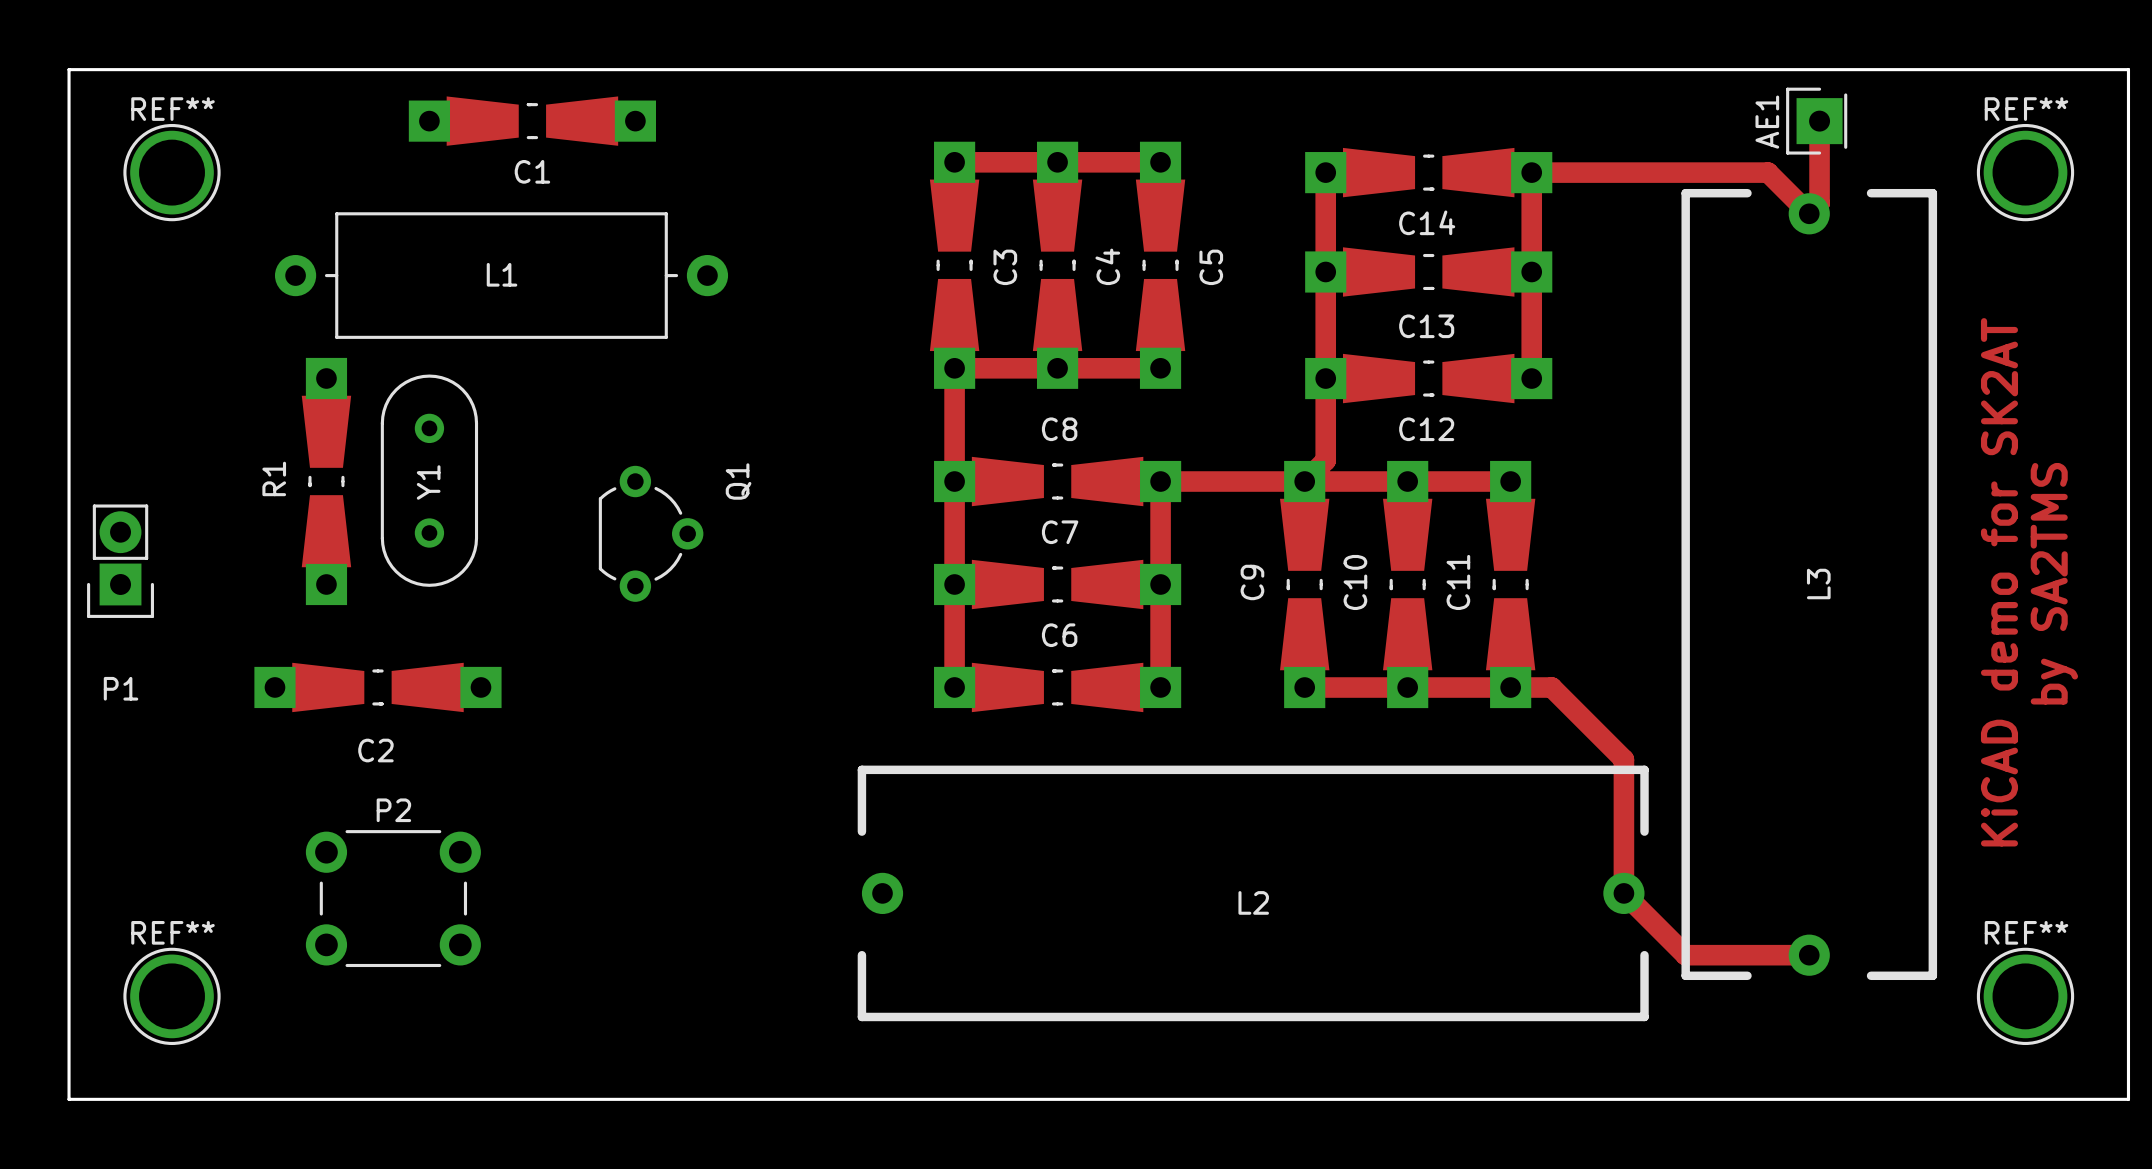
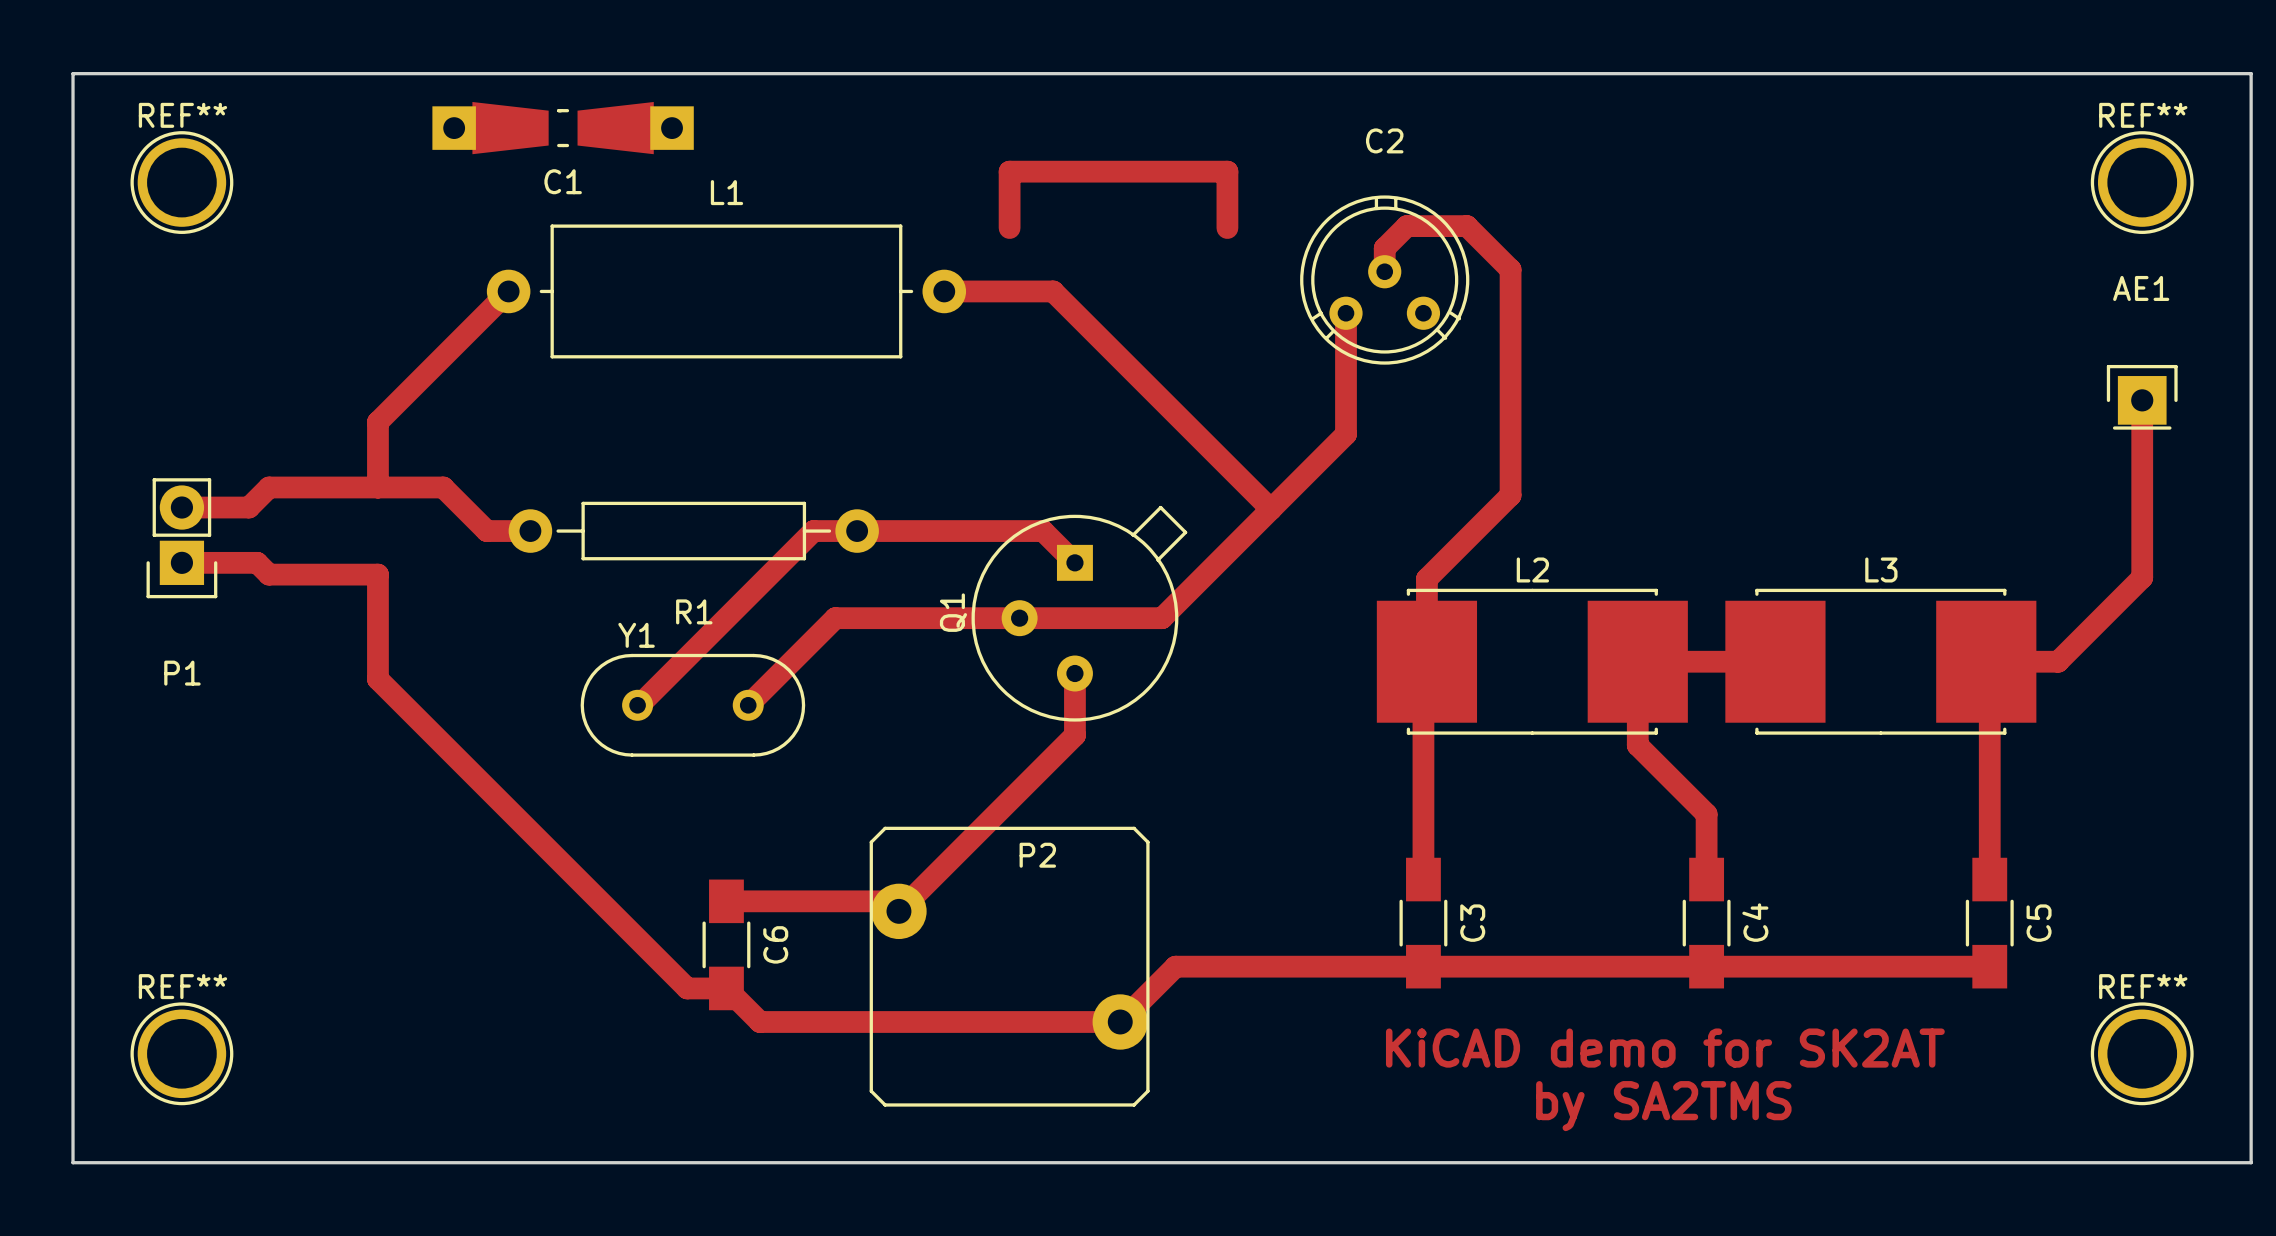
AE1 rotation: 0° (1816, 121) -> 90° clockwise (2142, 397)
AE1 position: (1816, 121) -> (2142, 397)
track: (1819, 121) (1819, 203) (1809, 213) (1768, 172) (1478, 172) -> none
AE1 name position: AE1 (1767, 122) -> AE1 (2141, 288)
C3 footprint: [929, 141, 980, 389] -> [1399, 857, 1448, 989]
C4 footprint: [1032, 141, 1083, 389] -> [1682, 857, 1731, 989]
C5 footprint: [1135, 141, 1186, 389] -> [1965, 857, 2014, 989]
track: (1379, 172) (1325, 172) (1325, 460) (1304, 481) (1304, 534) -> none
C14: (1428, 172) -> none
track: (1531, 172) (1531, 378) (1478, 378) -> none
L3 footprint: [1681, 188, 1938, 981] -> [1725, 588, 2037, 735]
track: none -> (1384, 271) (1384, 248) (1406, 226) (1467, 226) (1510, 269) (1510, 495) (1426, 578) (1426, 661) (1423, 665) (1423, 879)
C13: (1428, 271) -> none
L1 name position: L1 (502, 274) -> L1 (726, 192)
track: none -> (508, 291) (377, 422) (377, 487)
L1 position: (501, 275) -> (726, 291)
track: none -> (944, 291) (1053, 291) (1270, 509)
track: none -> (1346, 313) (1346, 434) (1162, 618) (1065, 618)
track: (954, 315) (954, 687) (1007, 687) -> none
track: (1160, 315) (1160, 368) (954, 368) -> none
R1 footprint: [301, 357, 352, 606] -> [508, 501, 879, 561]
C12: (1428, 378) -> none
track: none -> (2142, 400) (2142, 577) (2058, 661) (1986, 661) (1989, 665) (1989, 879)
Q1 footprint: [598, 465, 704, 602] -> [971, 505, 1188, 722]
R1 name position: R1 (274, 478) -> R1 (694, 611)
track: none -> (181, 507) (249, 507) (269, 487) (443, 487) (486, 531) (530, 531)
Y1 rotation: 0° (429, 480) -> 90° clockwise (692, 705)
Y1 position: (429, 480) -> (692, 705)
Q1 name position: Q1 (738, 481) -> Q1 (953, 612)
C8: (1057, 481) -> none
track: (1107, 481) (1510, 481) (1510, 534) -> none
track: (1160, 481) (1160, 687) (1107, 687) -> none
Y1 name position: Y1 (428, 482) -> Y1 (636, 635)
track: none -> (181, 562) (257, 562) (269, 574) (377, 574) (377, 679) (687, 988) (726, 988) (759, 1022) (1120, 1022) (1175, 966) (1989, 966)
track: none -> (1074, 562) (1043, 531) (813, 531) (637, 705)
P1 position: (120, 561) -> (181, 538)
text: KiCAD demo for SK2AT (1999, 582) -> none
text: by SA2TMS (2054, 583) -> none
track: none -> (1009, 618) (835, 618) (748, 705)
C7: (1057, 584) -> none
C9: (1304, 584) -> none
C10: (1407, 584) -> none
C11: (1510, 584) -> none
L3 name position: L3 (1818, 584) -> L3 (1881, 569)
track: none -> (1775, 661) (1637, 661) (1637, 745) (1706, 814) (1706, 879)
track: (1304, 634) (1304, 687) (1551, 687) (1623, 759) (1623, 893) (1685, 955) (1809, 955) -> none
C6 name position: C6 (1059, 635) -> C6 (775, 944)
track: none -> (1074, 673) (1074, 735) (898, 911) (888, 901) (726, 901)
C2 footprint: [254, 662, 502, 713] -> [1300, 195, 1470, 365]
C6 footprint: [934, 662, 1182, 713] -> [702, 879, 751, 1011]
C2 name position: C2 (375, 750) -> C2 (1384, 140)
L2 footprint: [857, 765, 1649, 1022] -> [1376, 588, 1688, 735]
P2 footprint: [305, 830, 481, 968] -> [869, 826, 1150, 1107]
L2 name position: L2 (1253, 902) -> L2 (1532, 569)
text: none -> KiCAD demo for SK2AT (1665, 1048)
text: none -> by SA2TMS (1663, 1106)

